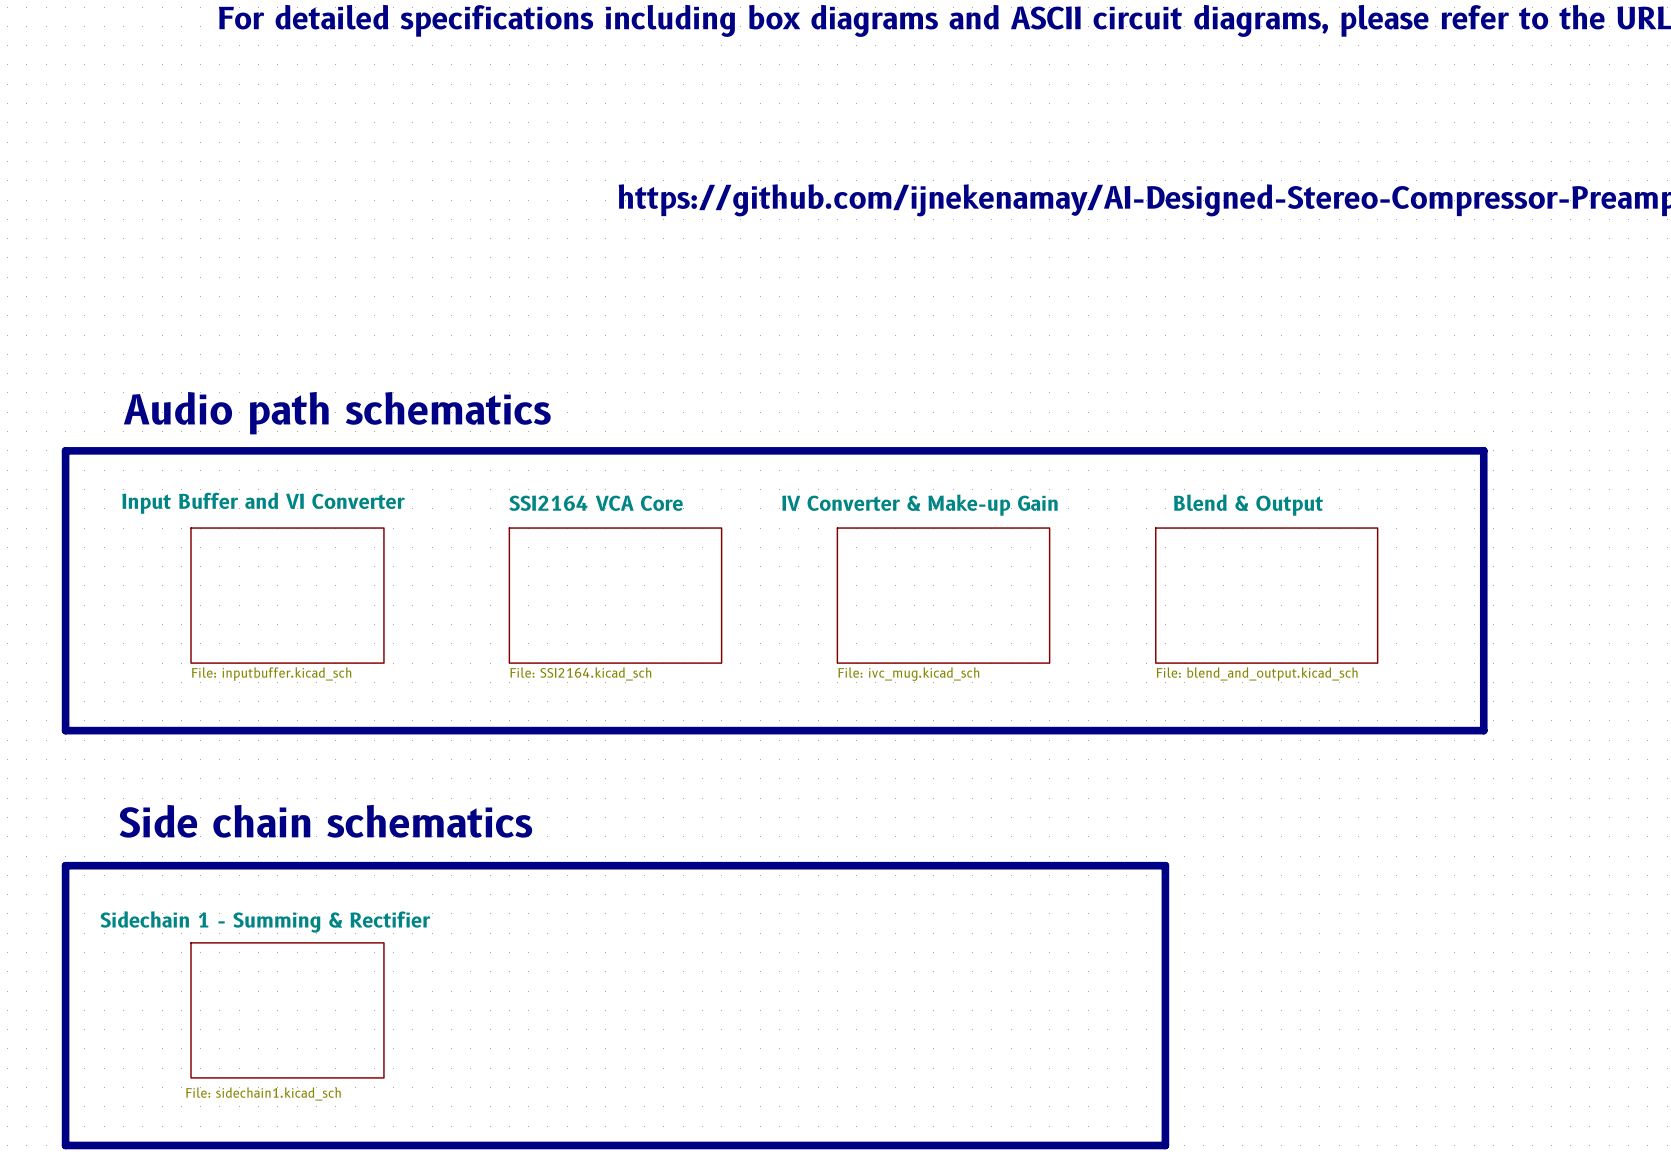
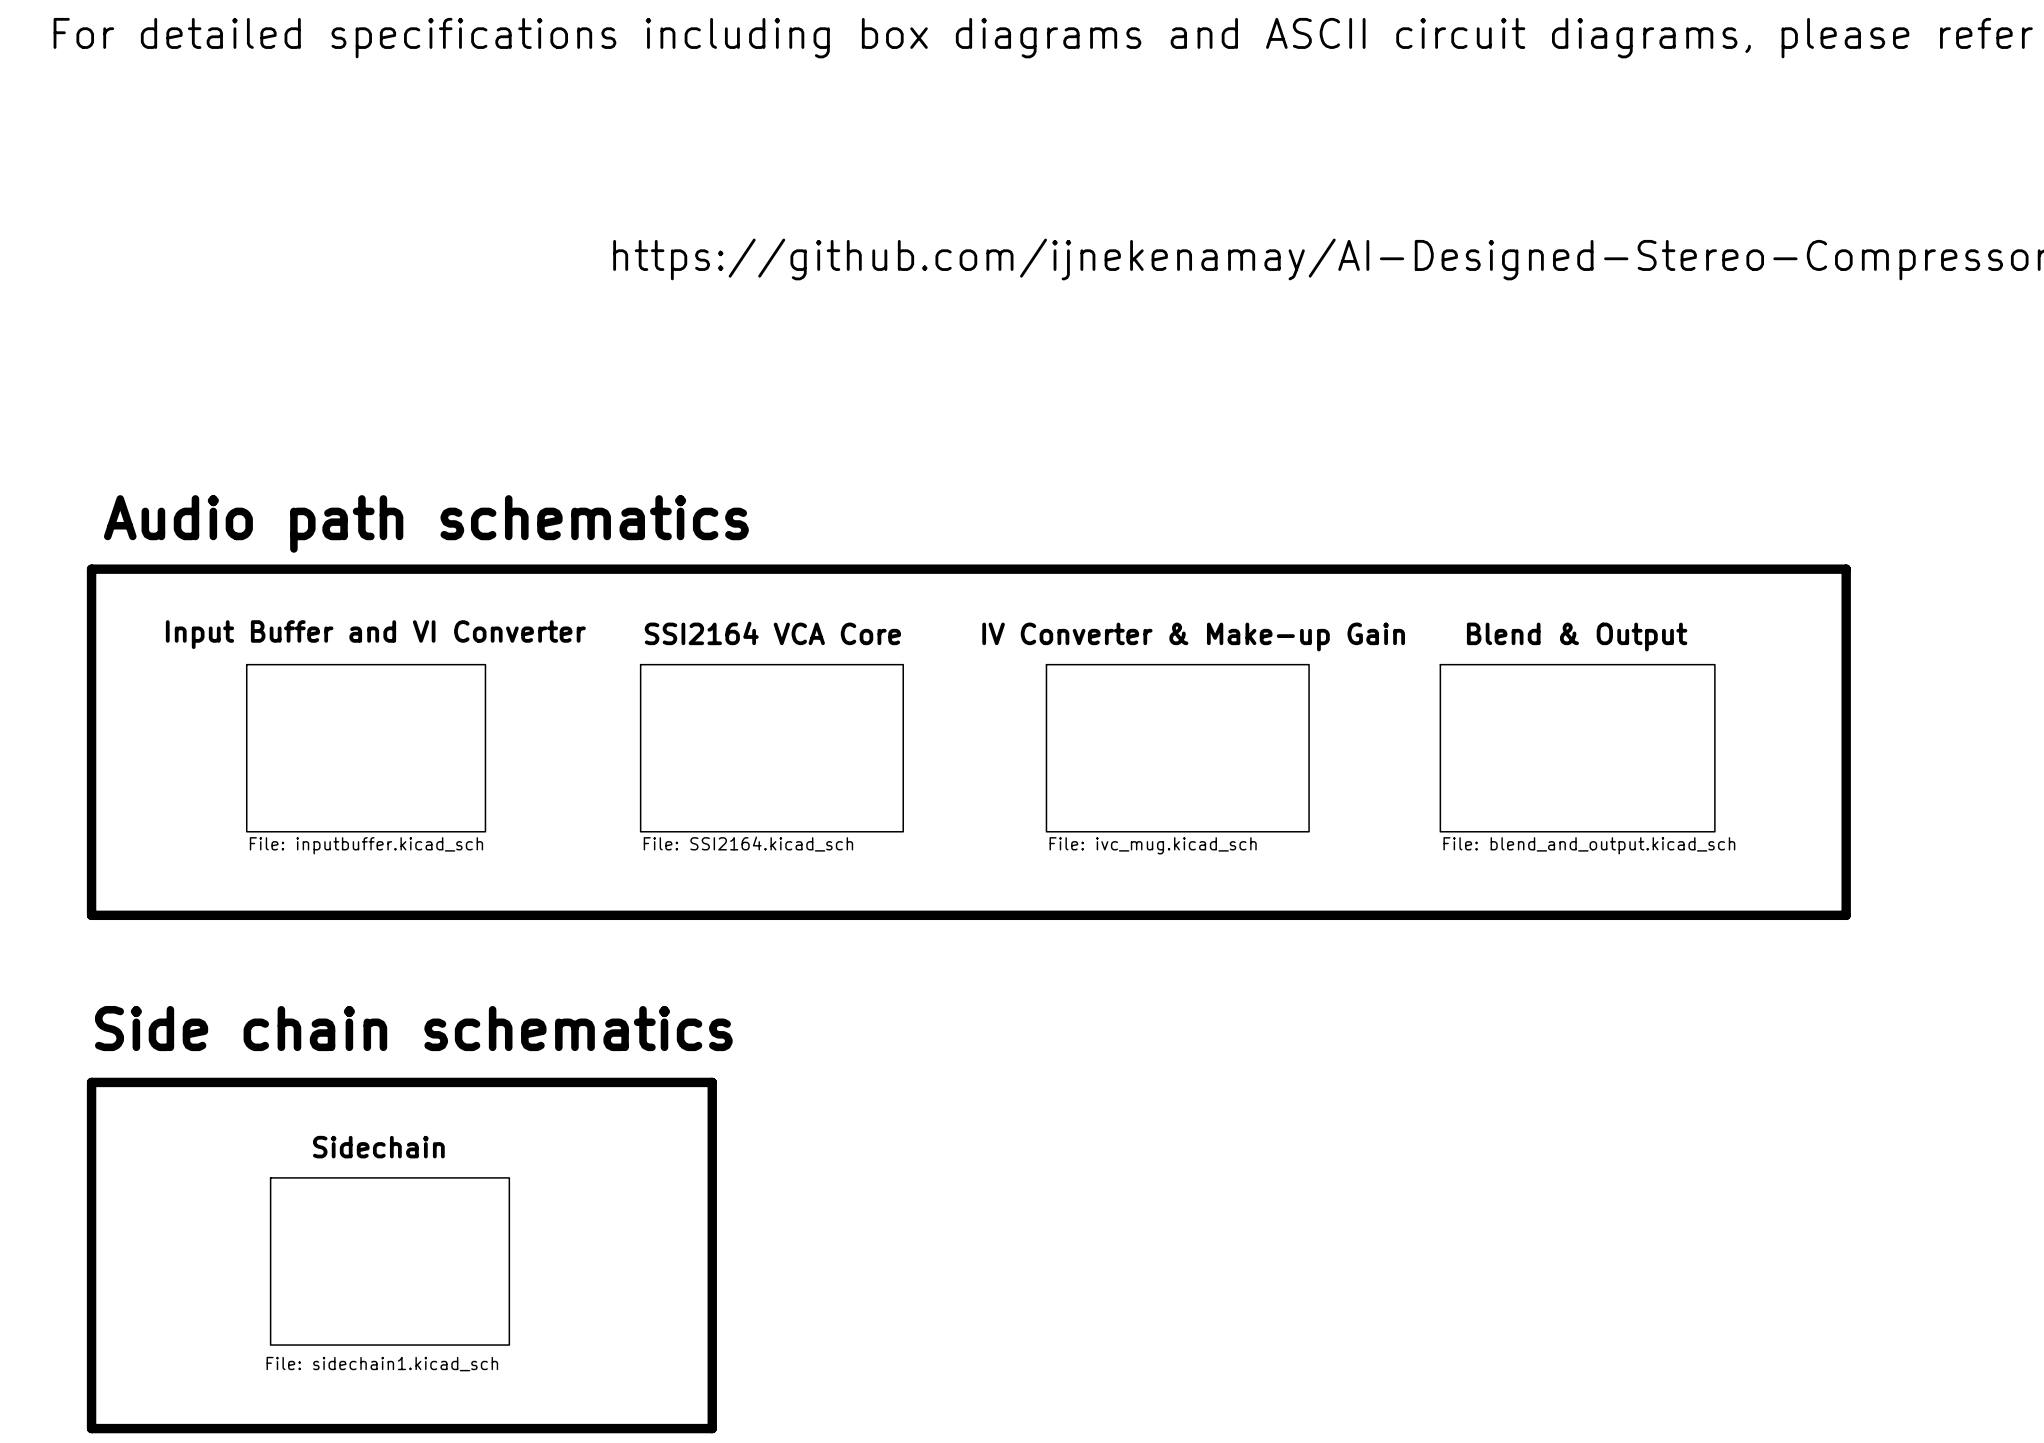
line: (567, 865) (1165, 865) (1165, 1145) (567, 1145) -> (712, 1082) (712, 1428)
sheet Sidechain 1 - Summing & Rectifier: File: sidechain1.kicad_sch (287, 1010) -> none
sheet Sidechain: none -> File: sidechain1.kicad_sch (389, 1261)

